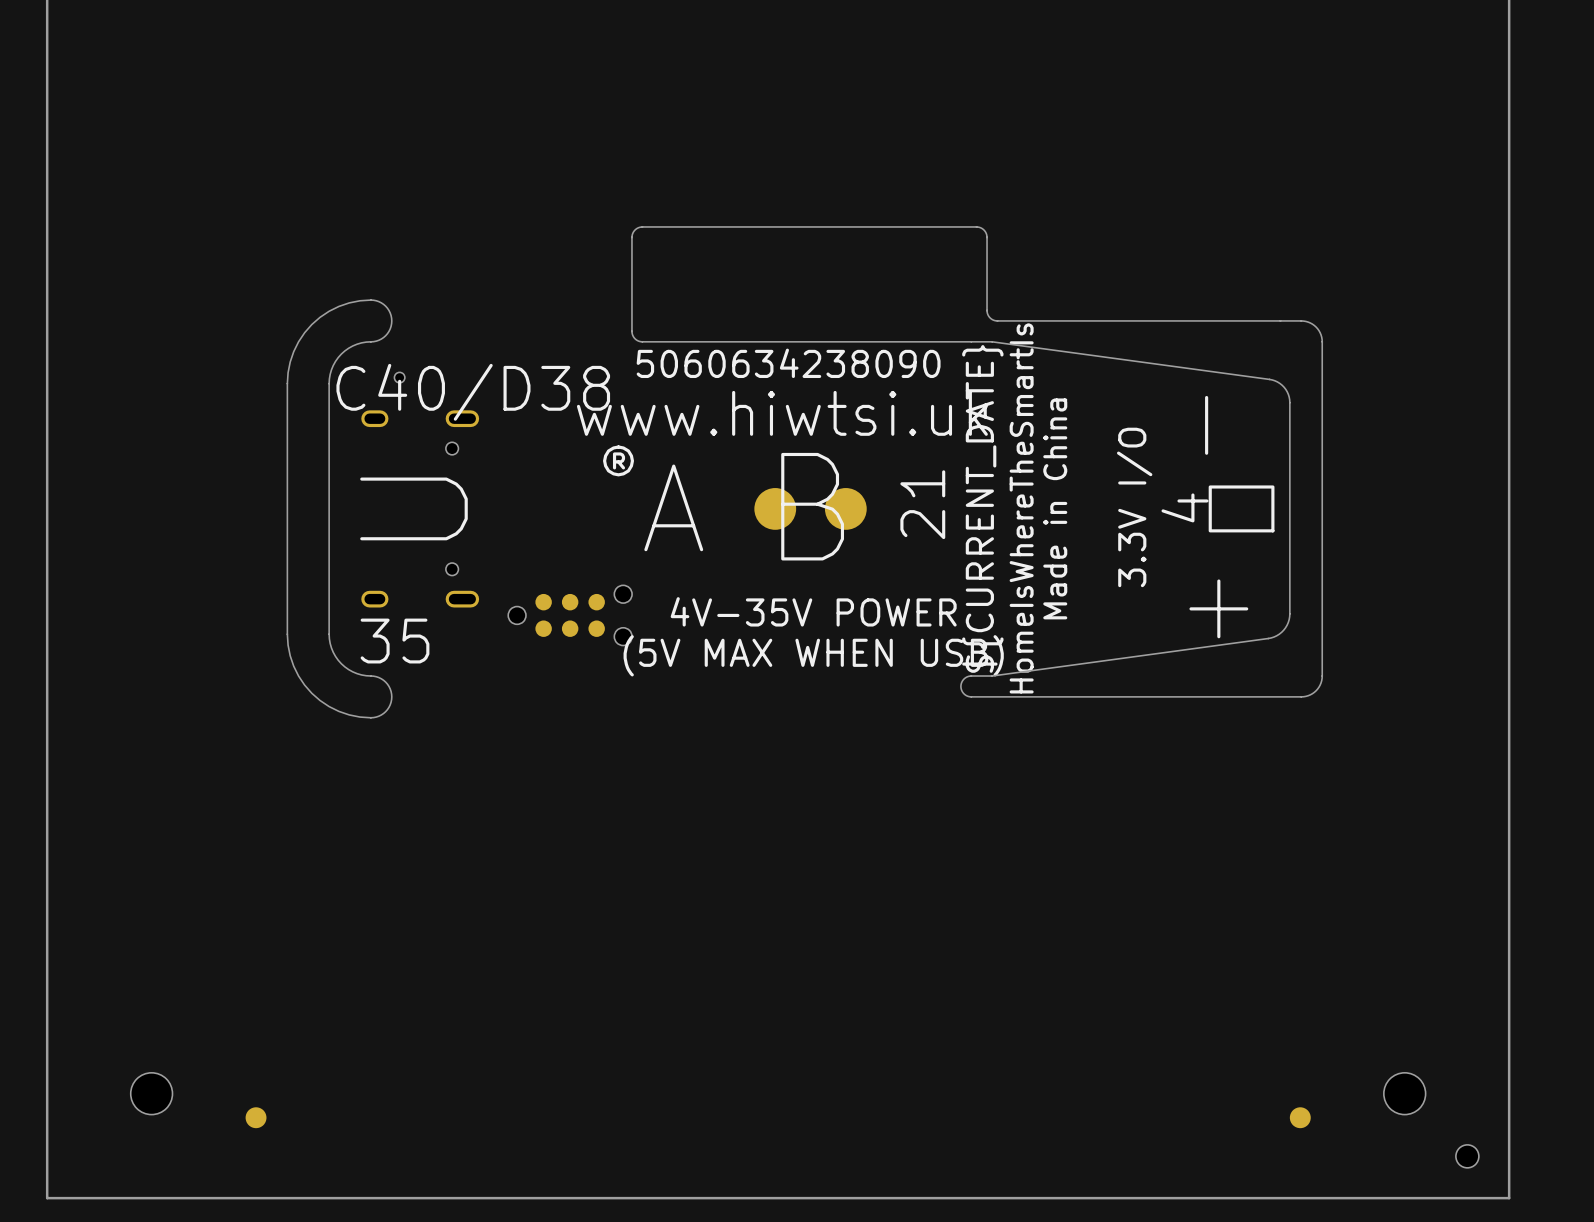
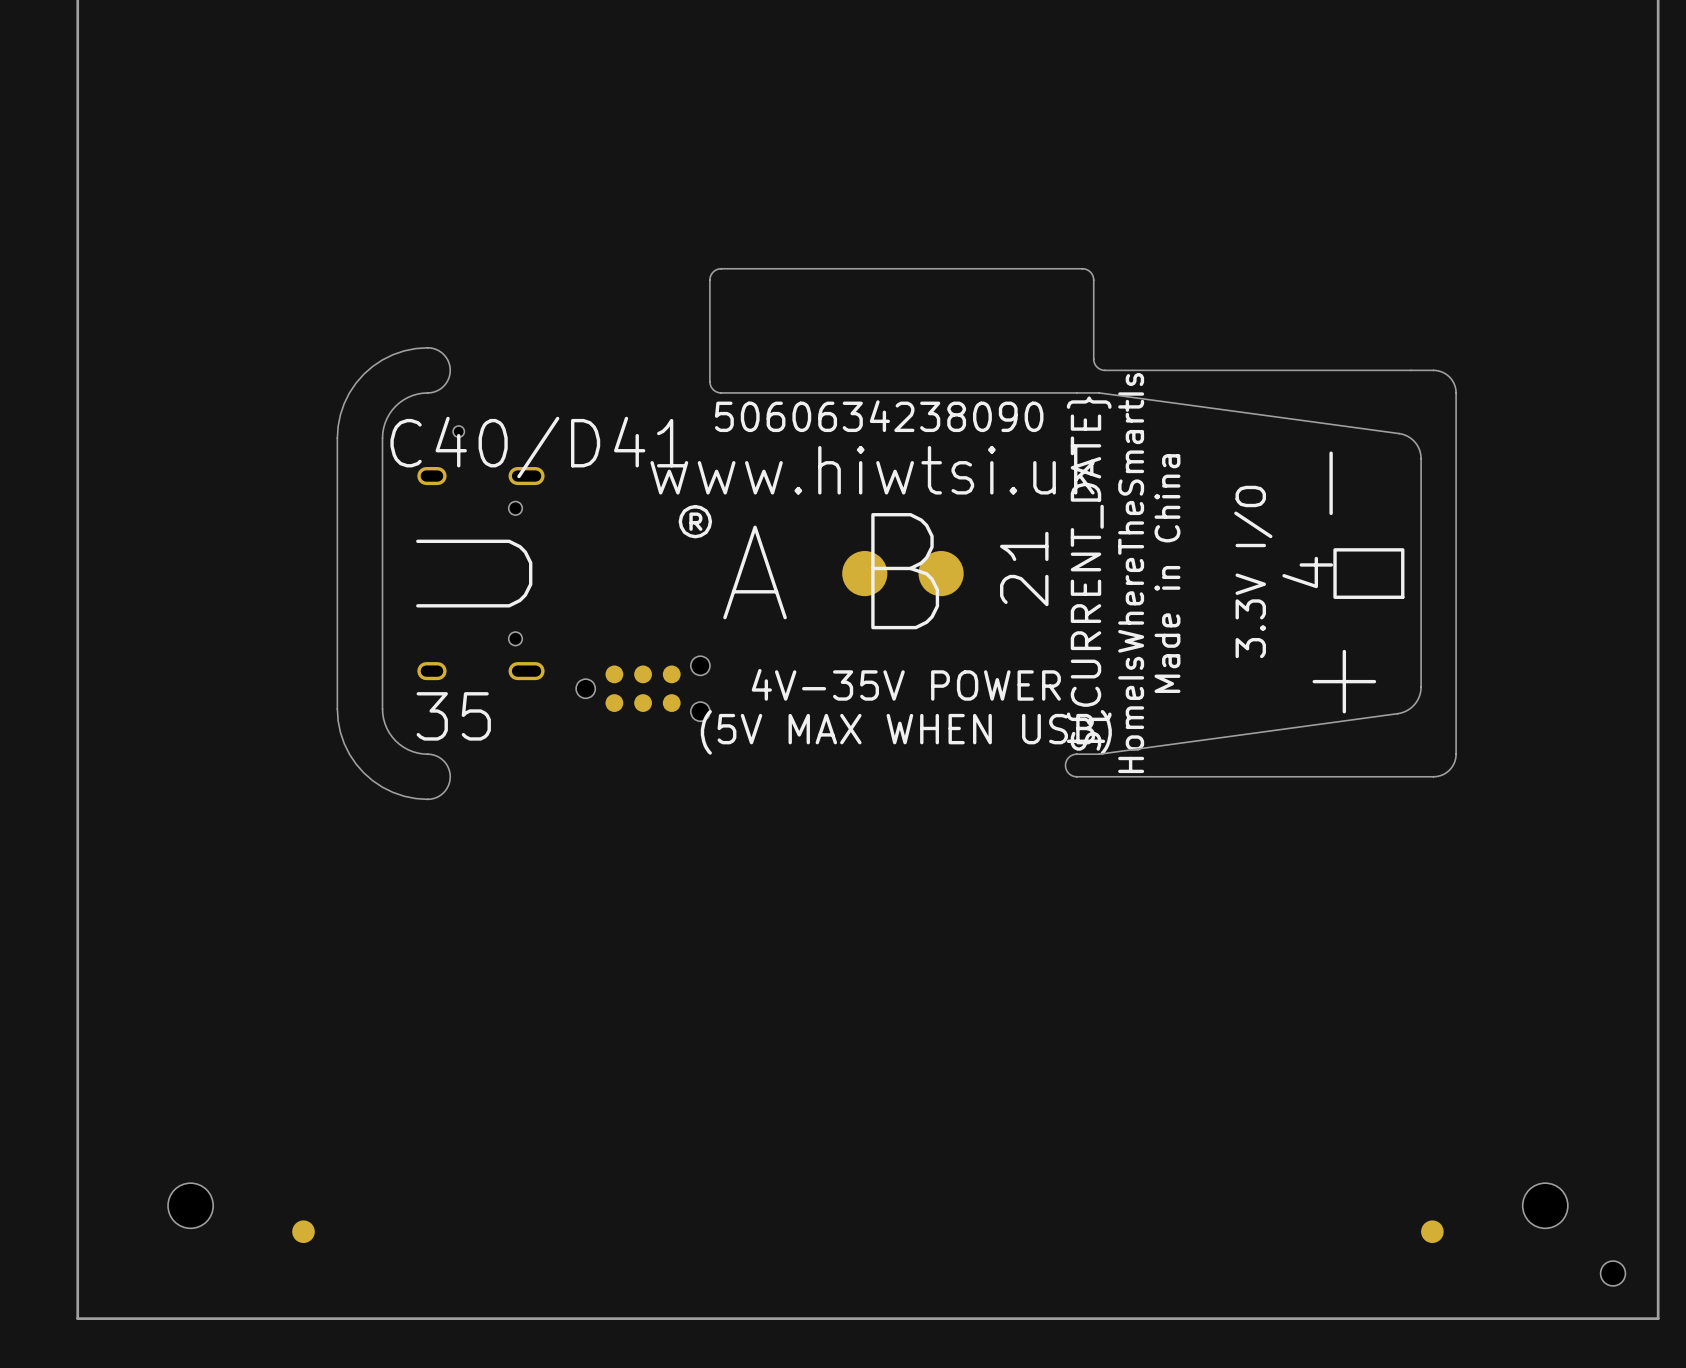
text: C40/D38 (473, 392) -> C40/D41 (538, 447)

